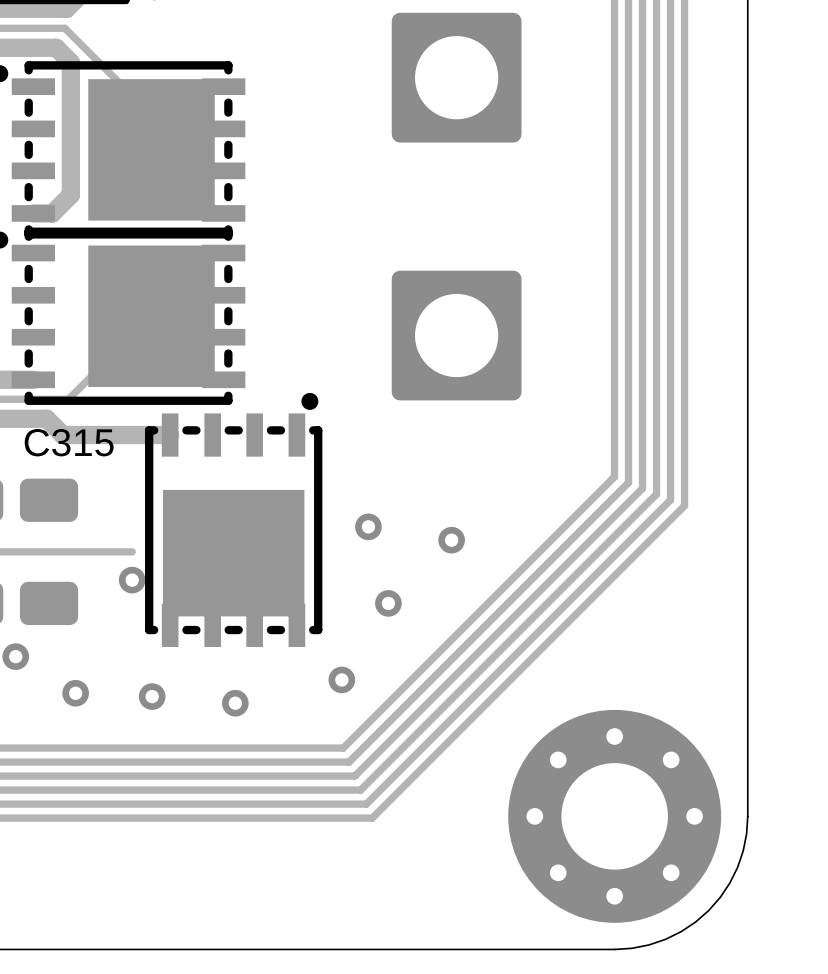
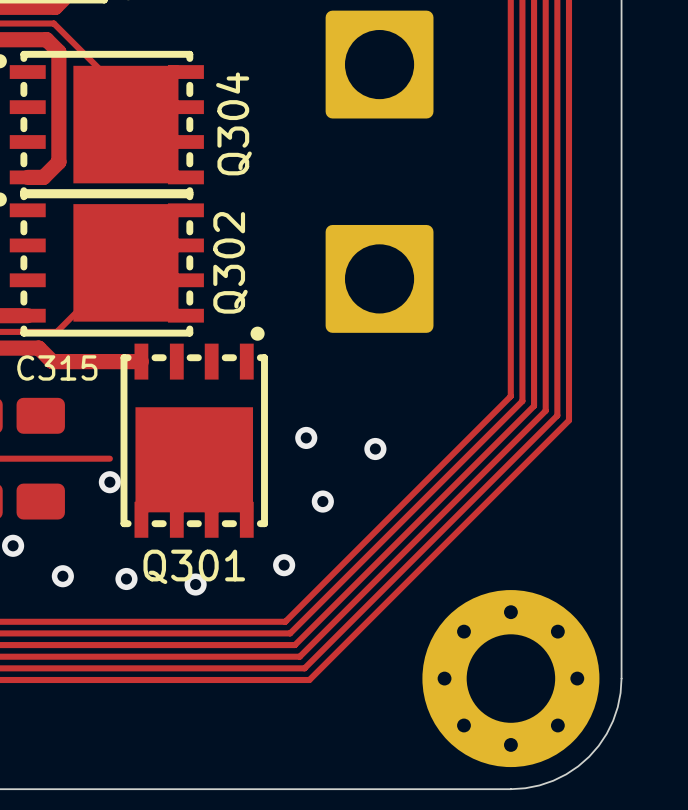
Q304 name: none -> Q304 (233, 123)
Q302 name: none -> Q302 (230, 262)
Q301 name: none -> Q301 (194, 566)

